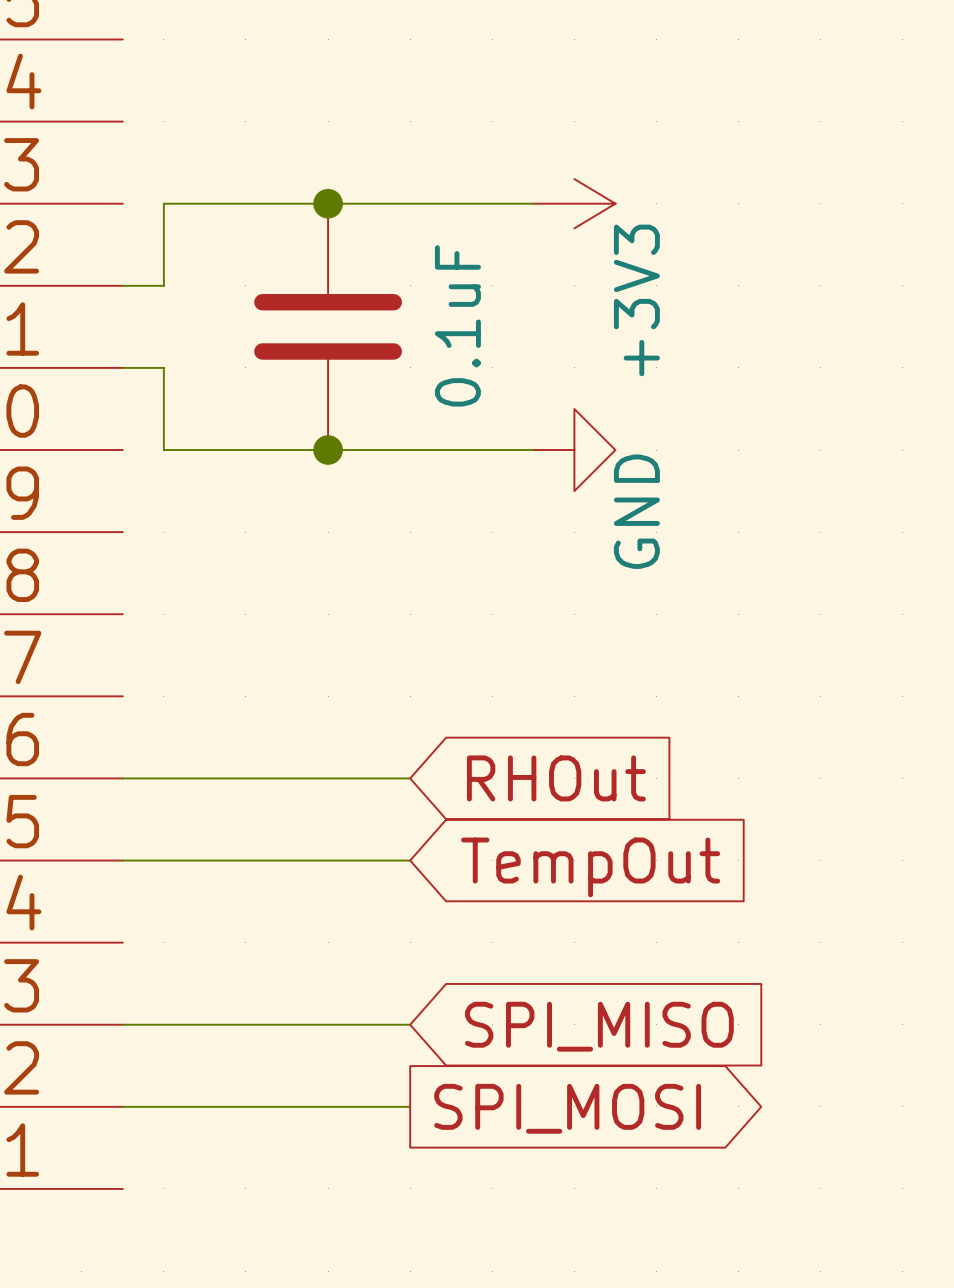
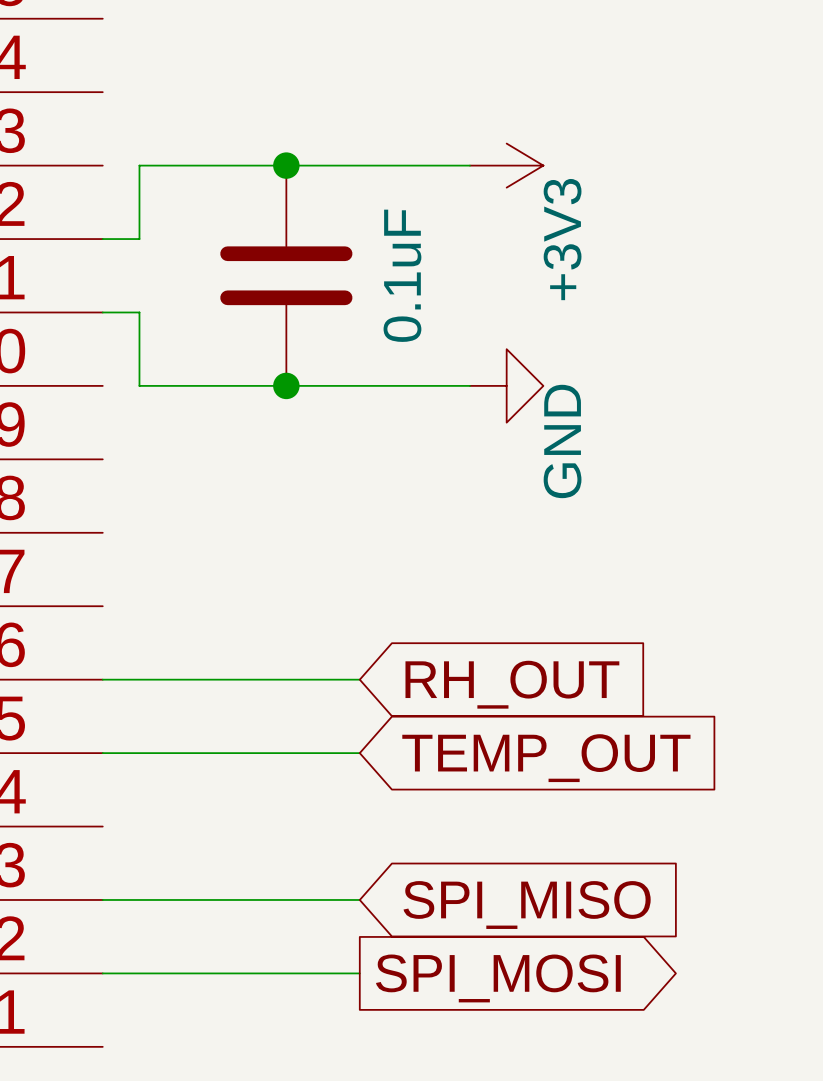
global label: RHOut (556, 778) -> RH_OUT (512, 684)
global label: TempOut (590, 867) -> TEMP_OUT (546, 758)

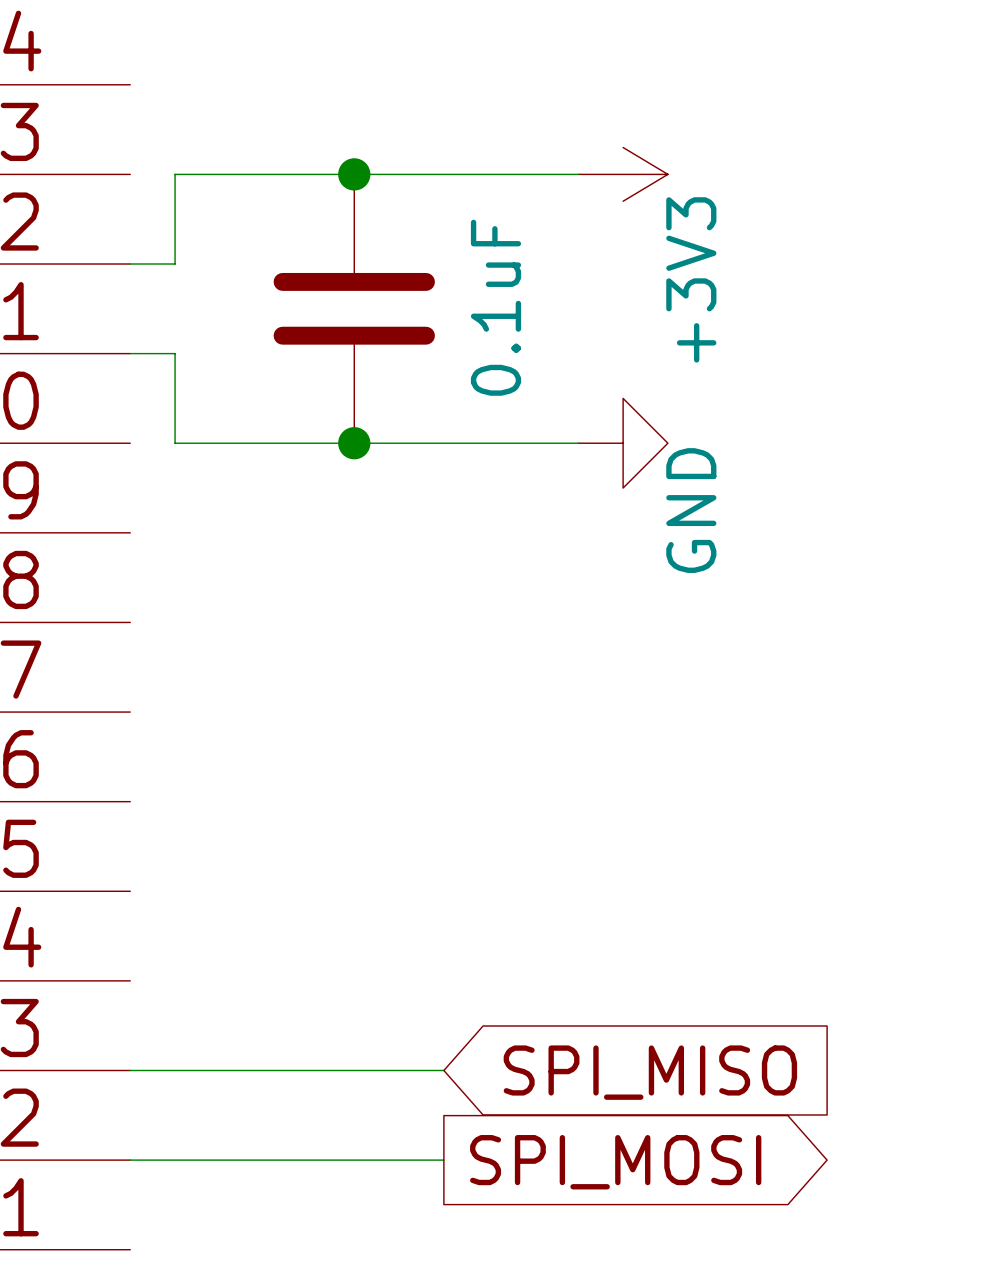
wire: (102, 679) (359, 679) -> none
global label: RH_OUT (512, 684) -> none
wire: (102, 753) (359, 753) -> none
global label: TEMP_OUT (546, 758) -> none

